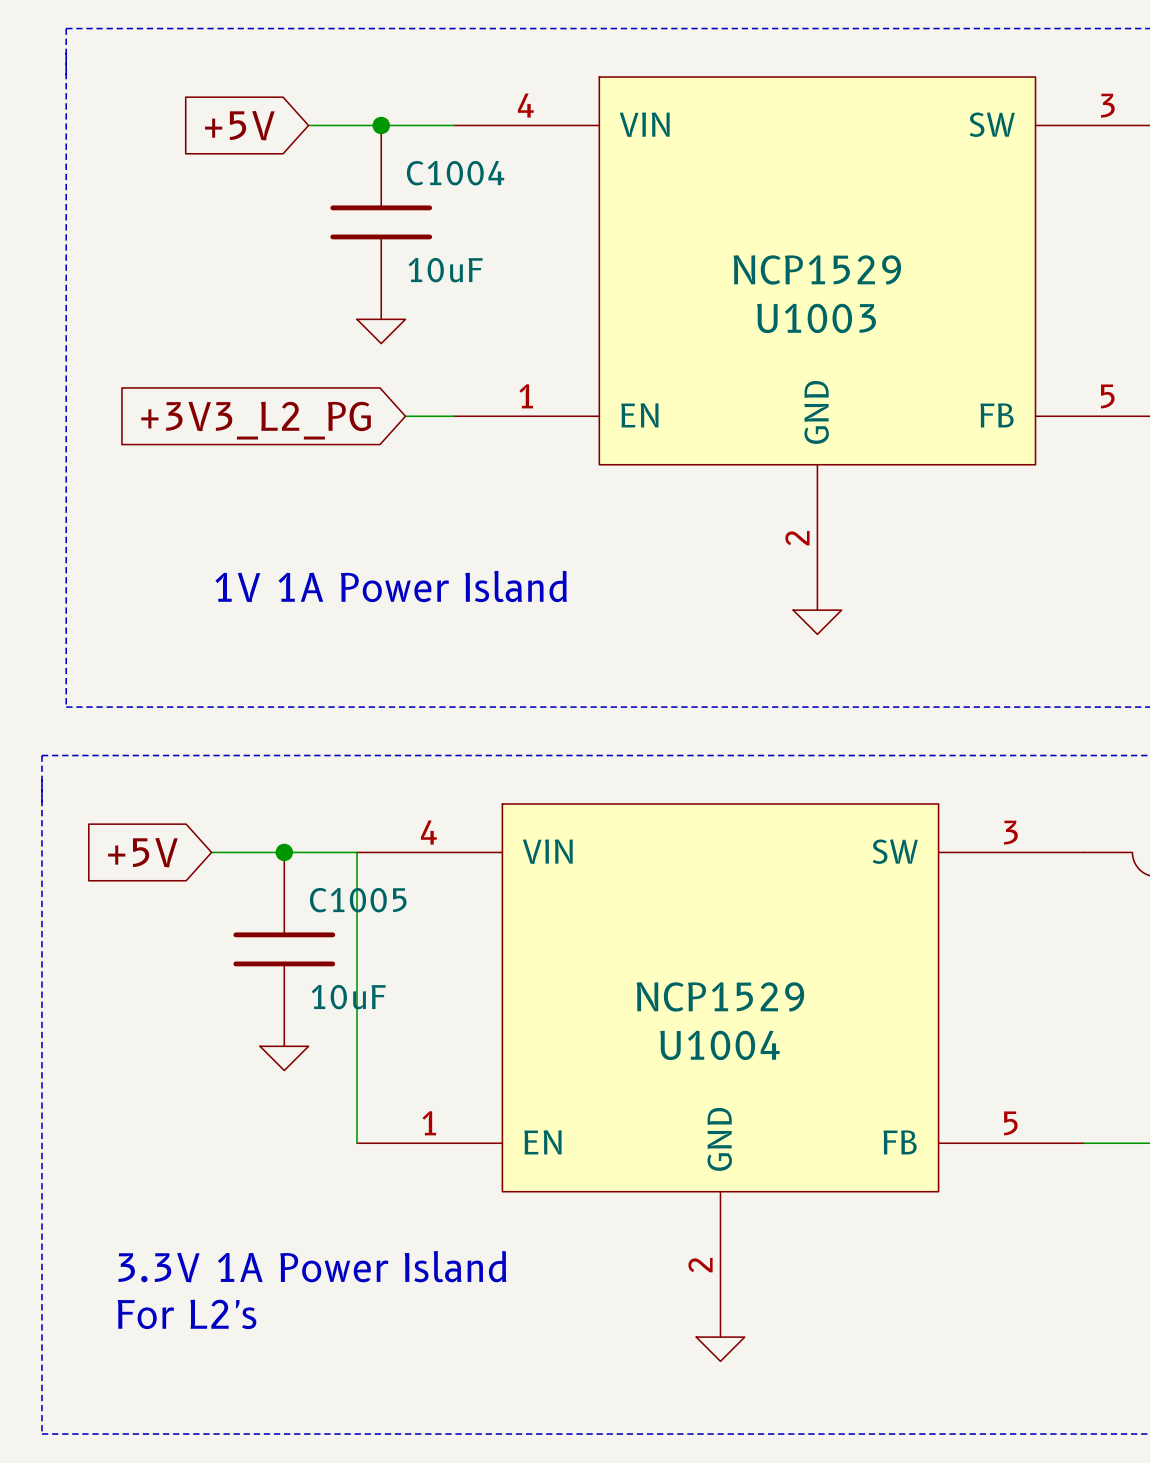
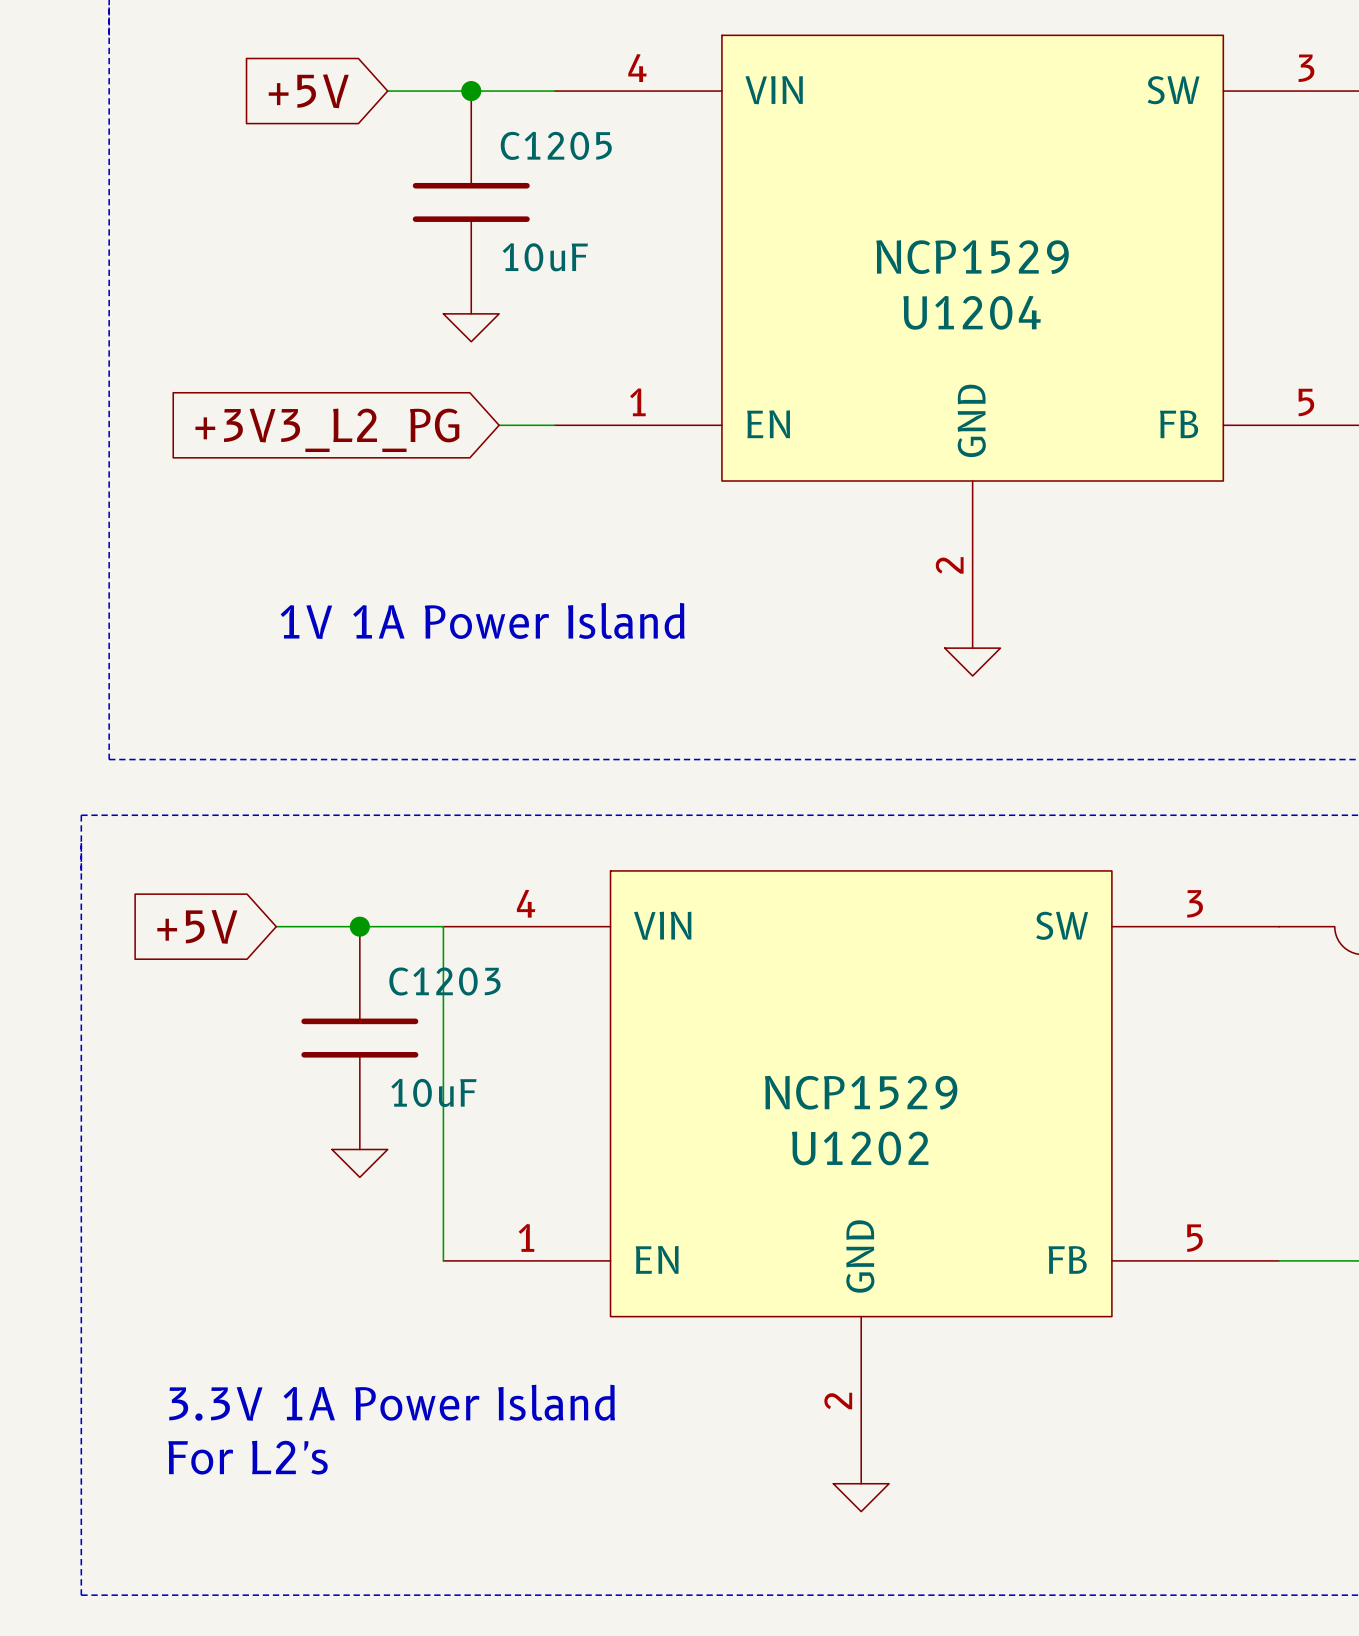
C1004 name: C1004 (455, 173) -> C1205 (556, 145)
U1003 name: U1003 (816, 318) -> U1204 (972, 312)
C1005 name: C1005 (358, 900) -> C1203 (444, 981)
U1004 name: U1004 (720, 1045) -> U1202 (860, 1148)

